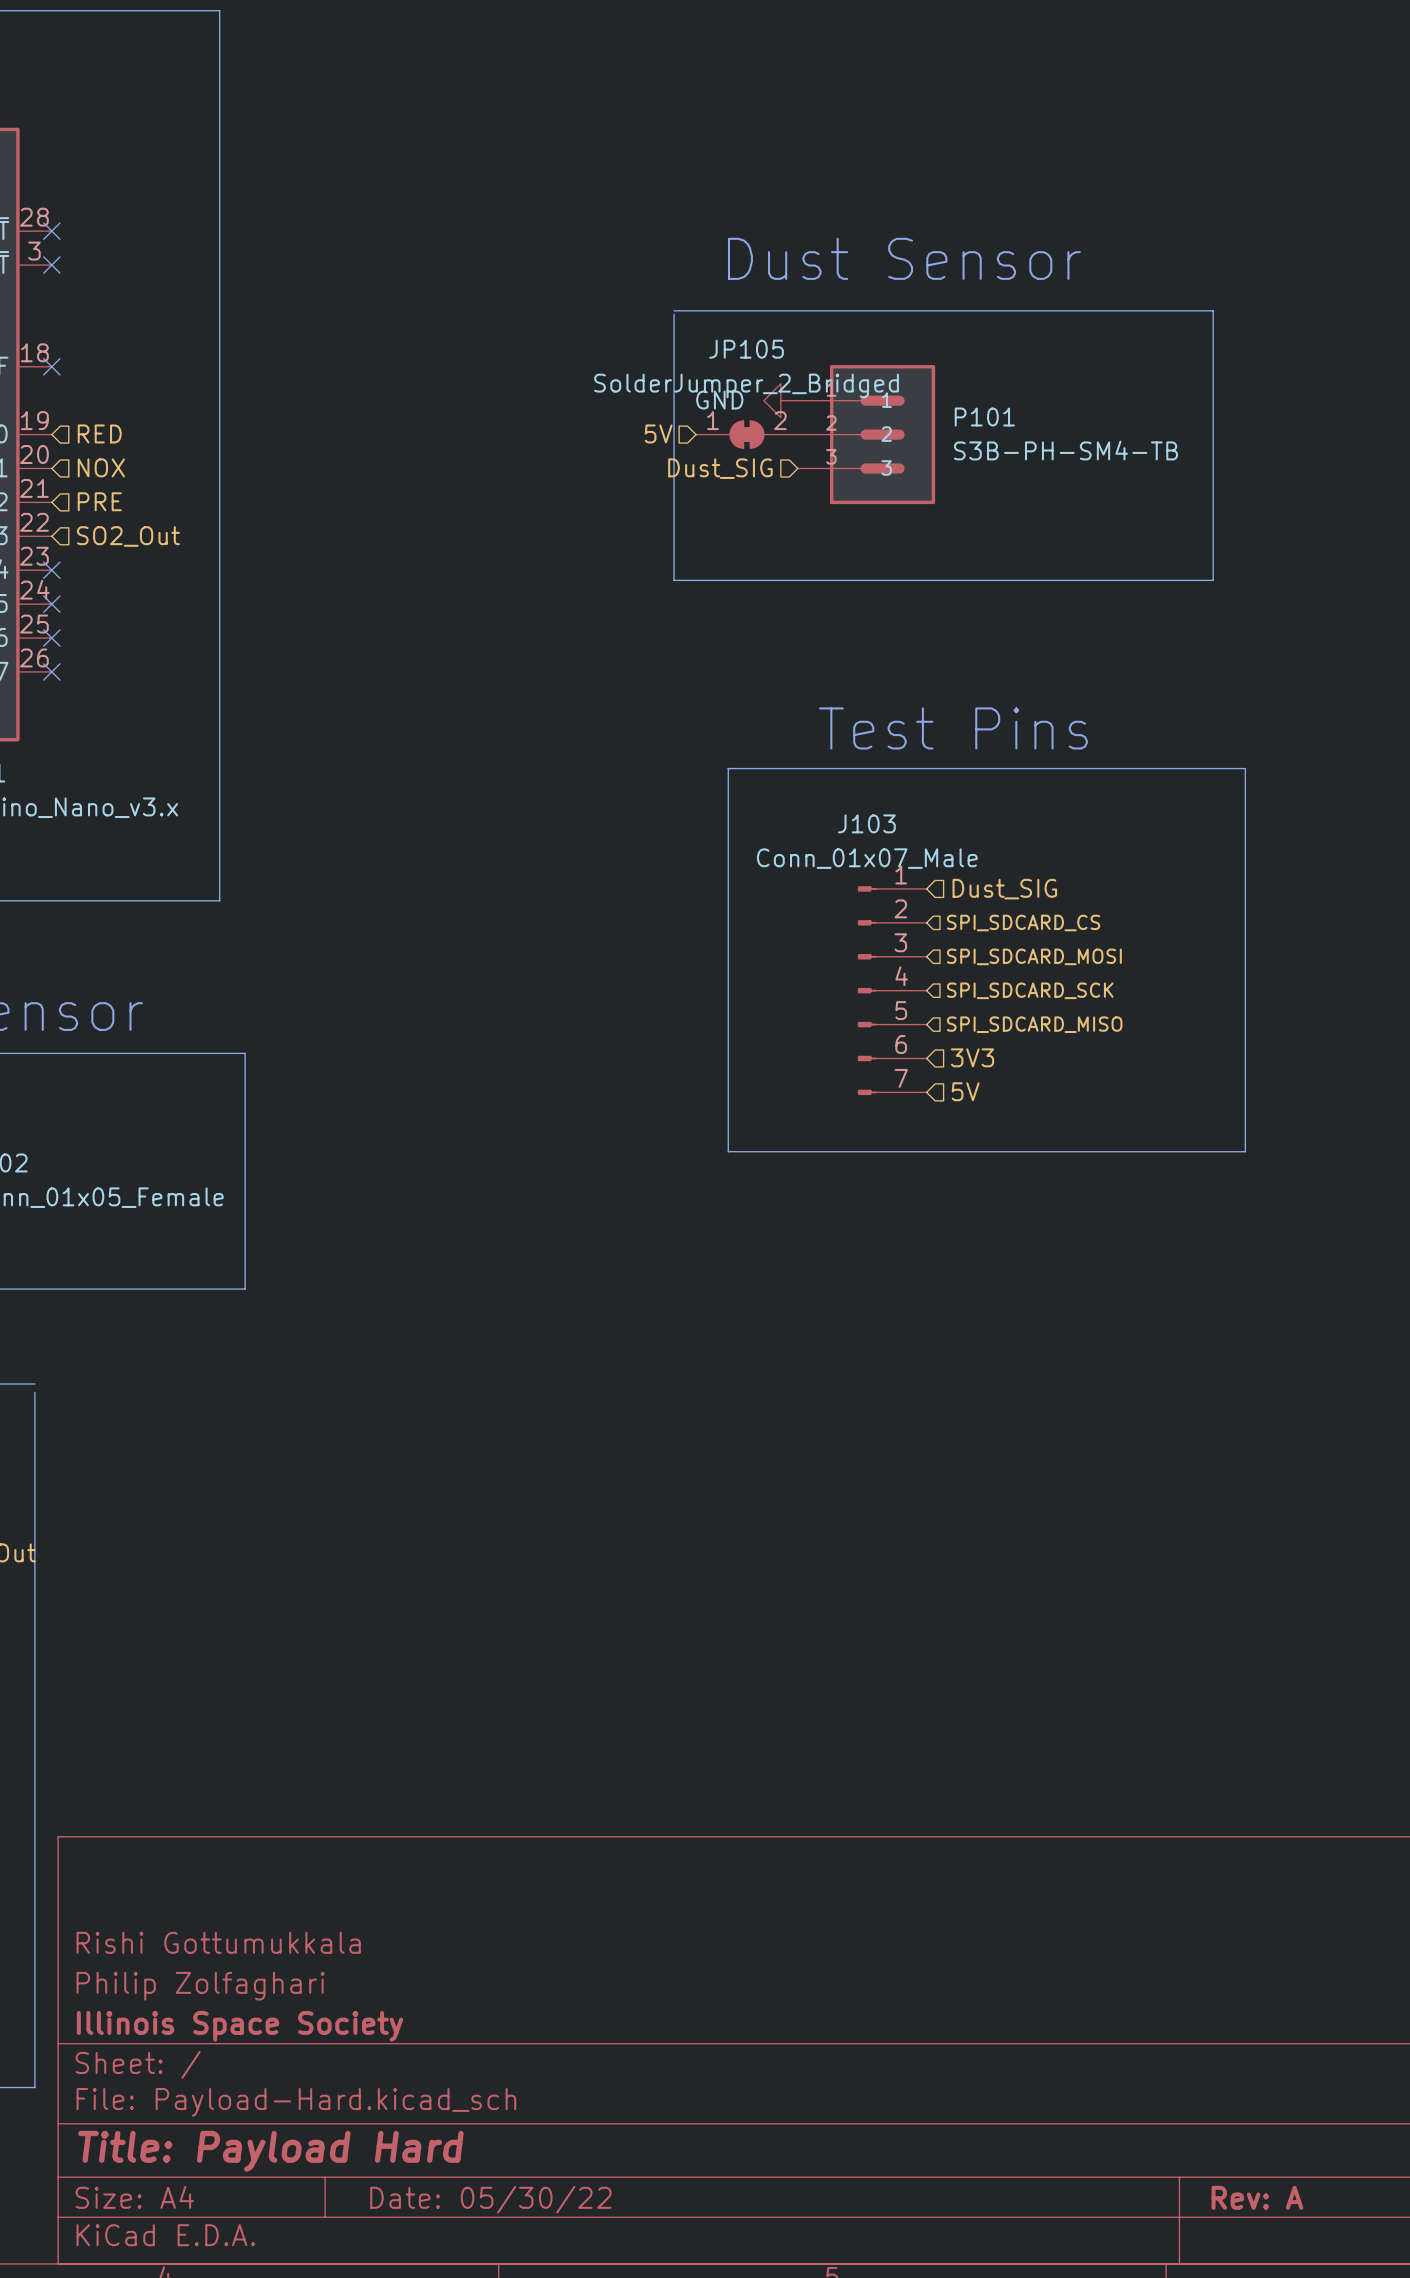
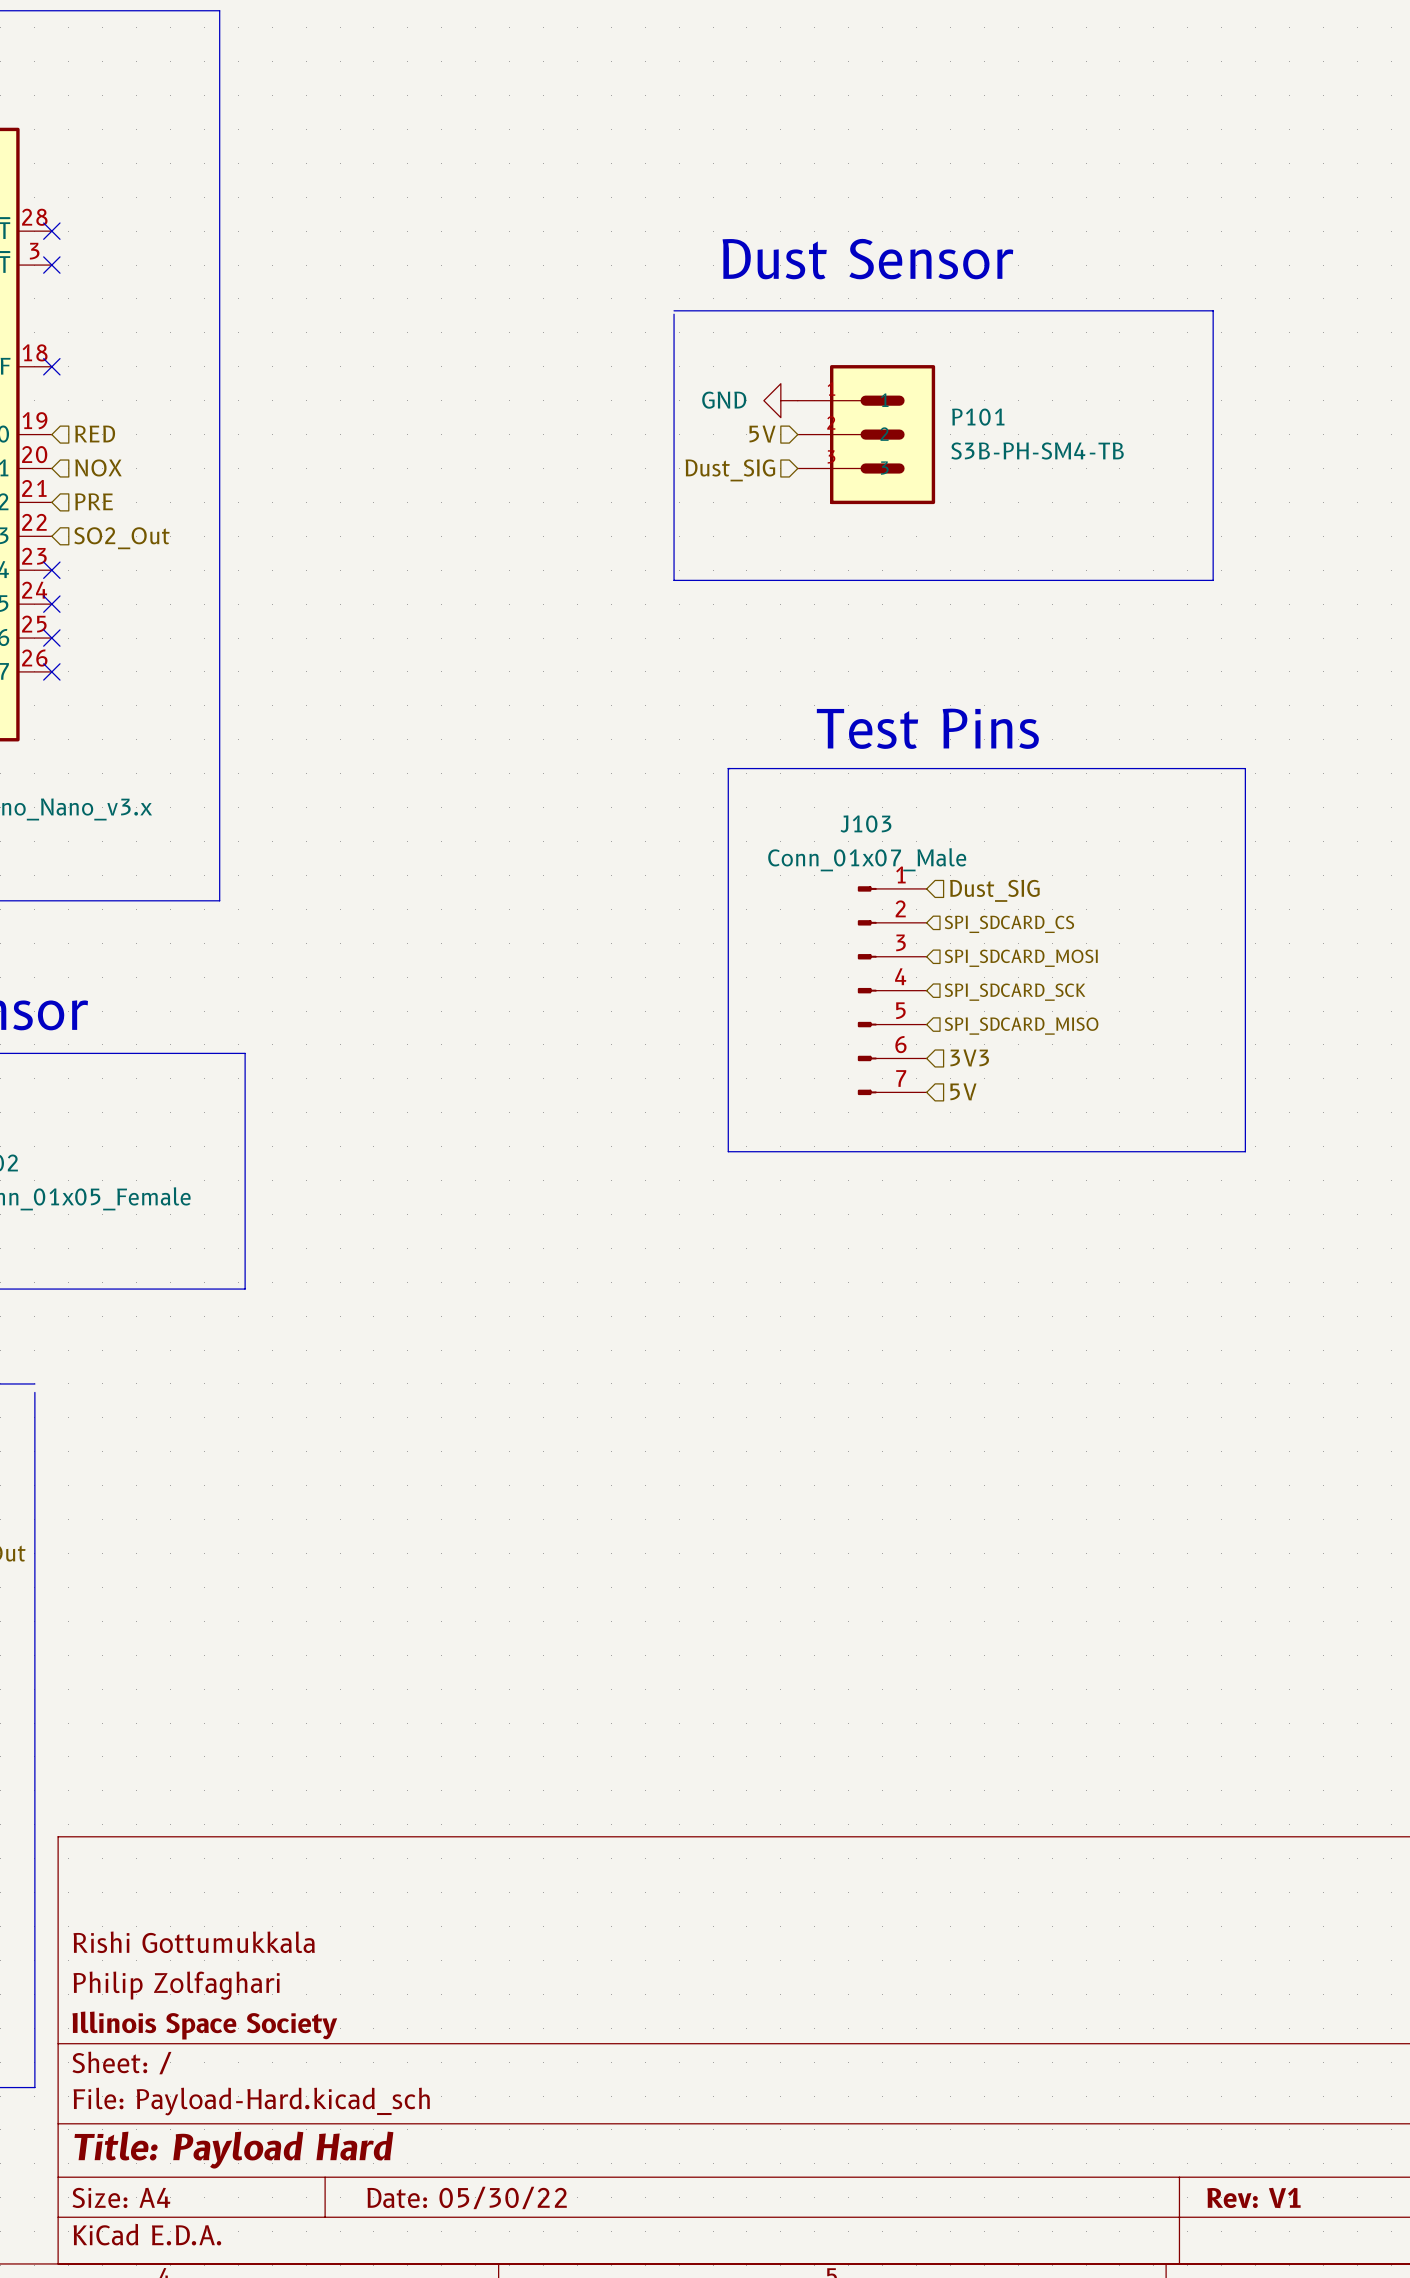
hierarchical label position: 5V (658, 433) -> 5V (762, 434)
JP105: SolderJumper_2_Bridged (746, 434) -> none
title block: Rev: A (1257, 2197) -> Rev: V1 (1253, 2197)

